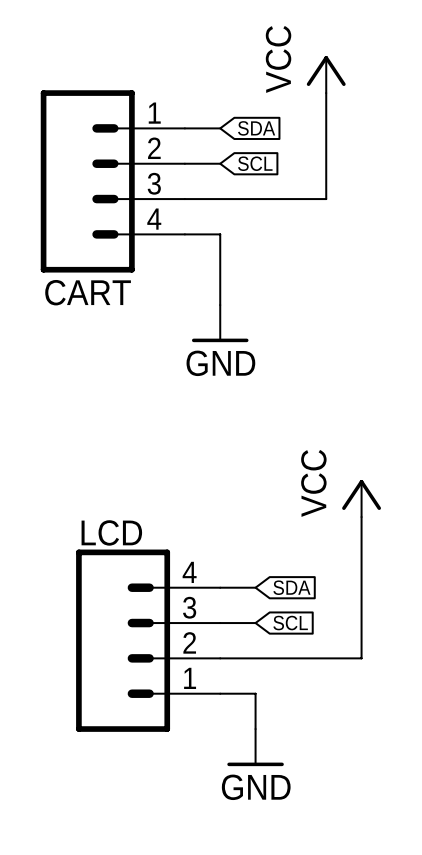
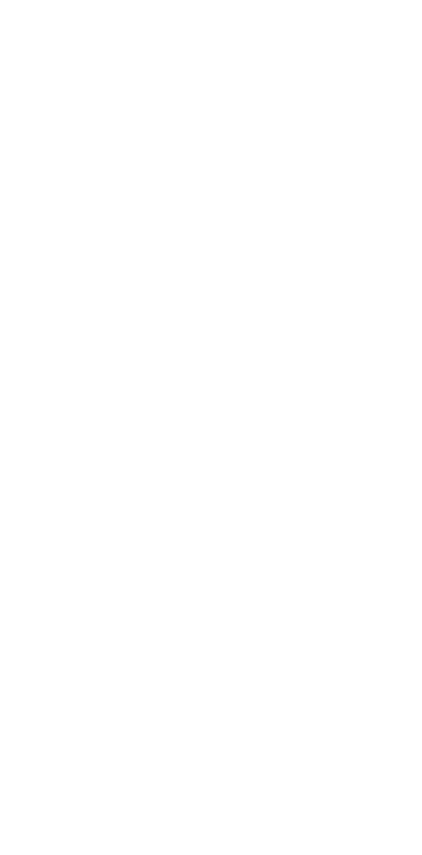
power symbol: VCC (326, 74) -> none
wire: (326, 93) (326, 199) (184, 199) -> none
wire: (184, 128) (220, 128) -> none
global label: SDA (256, 128) -> none
wire: (184, 163) (220, 163) -> none
global label: SCL (255, 163) -> none
CART: (112, 181) -> none
wire: (184, 234) (220, 234) (220, 305) -> none
power symbol: GND (220, 323) -> none
power symbol: VCC (361, 498) -> none
wire: (361, 517) (361, 658) (220, 658) -> none
wire: (220, 587) (255, 587) -> none
global label: SDA (291, 587) -> none
wire: (220, 623) (255, 623) -> none
global label: SCL (290, 623) -> none
LCD: (148, 640) -> none
wire: (220, 693) (255, 693) (255, 729) -> none
power symbol: GND (255, 747) -> none

